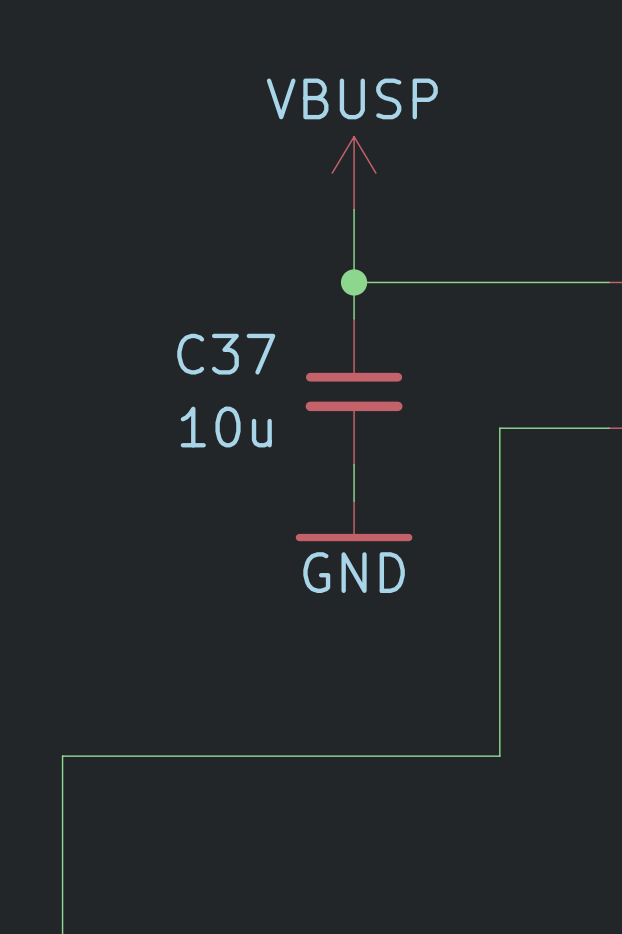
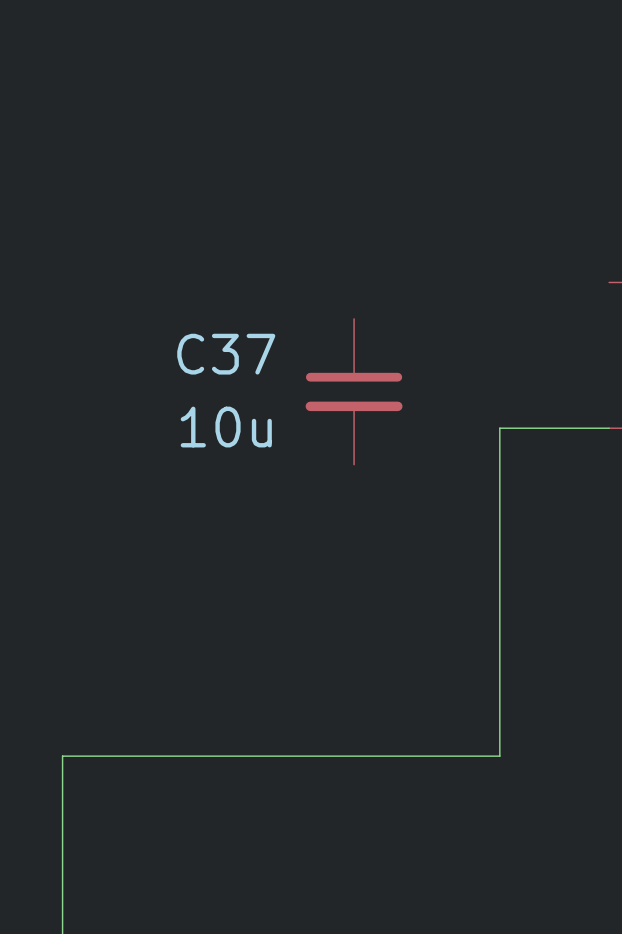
power symbol: VBUSP (354, 173) -> none
wire: (354, 209) (354, 318) -> none
wire: (354, 282) (609, 282) -> none
junction: (354, 282) -> none
wire: (354, 464) (354, 501) -> none
power symbol: GND (354, 521) -> none

